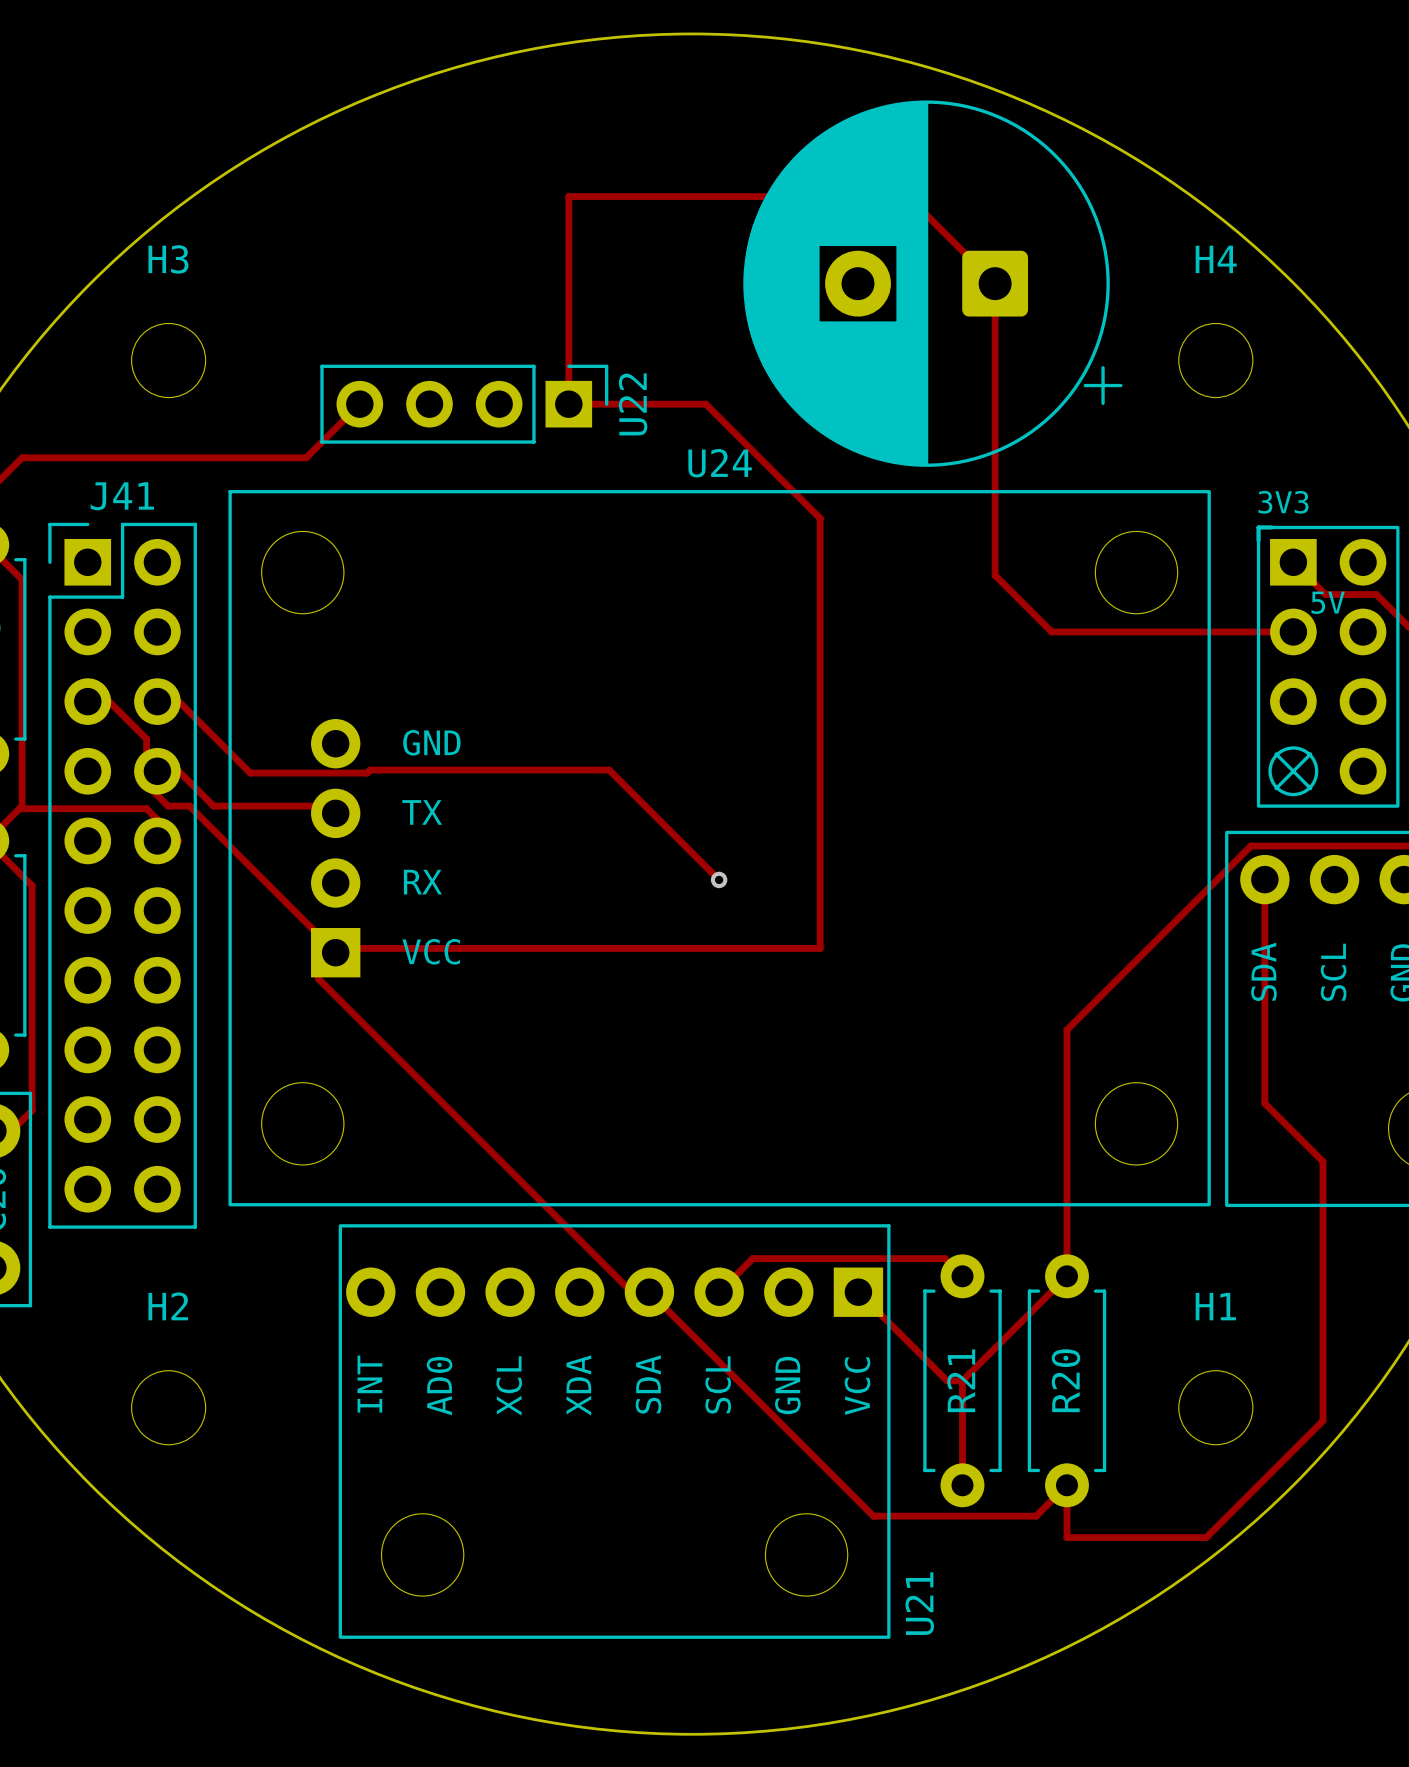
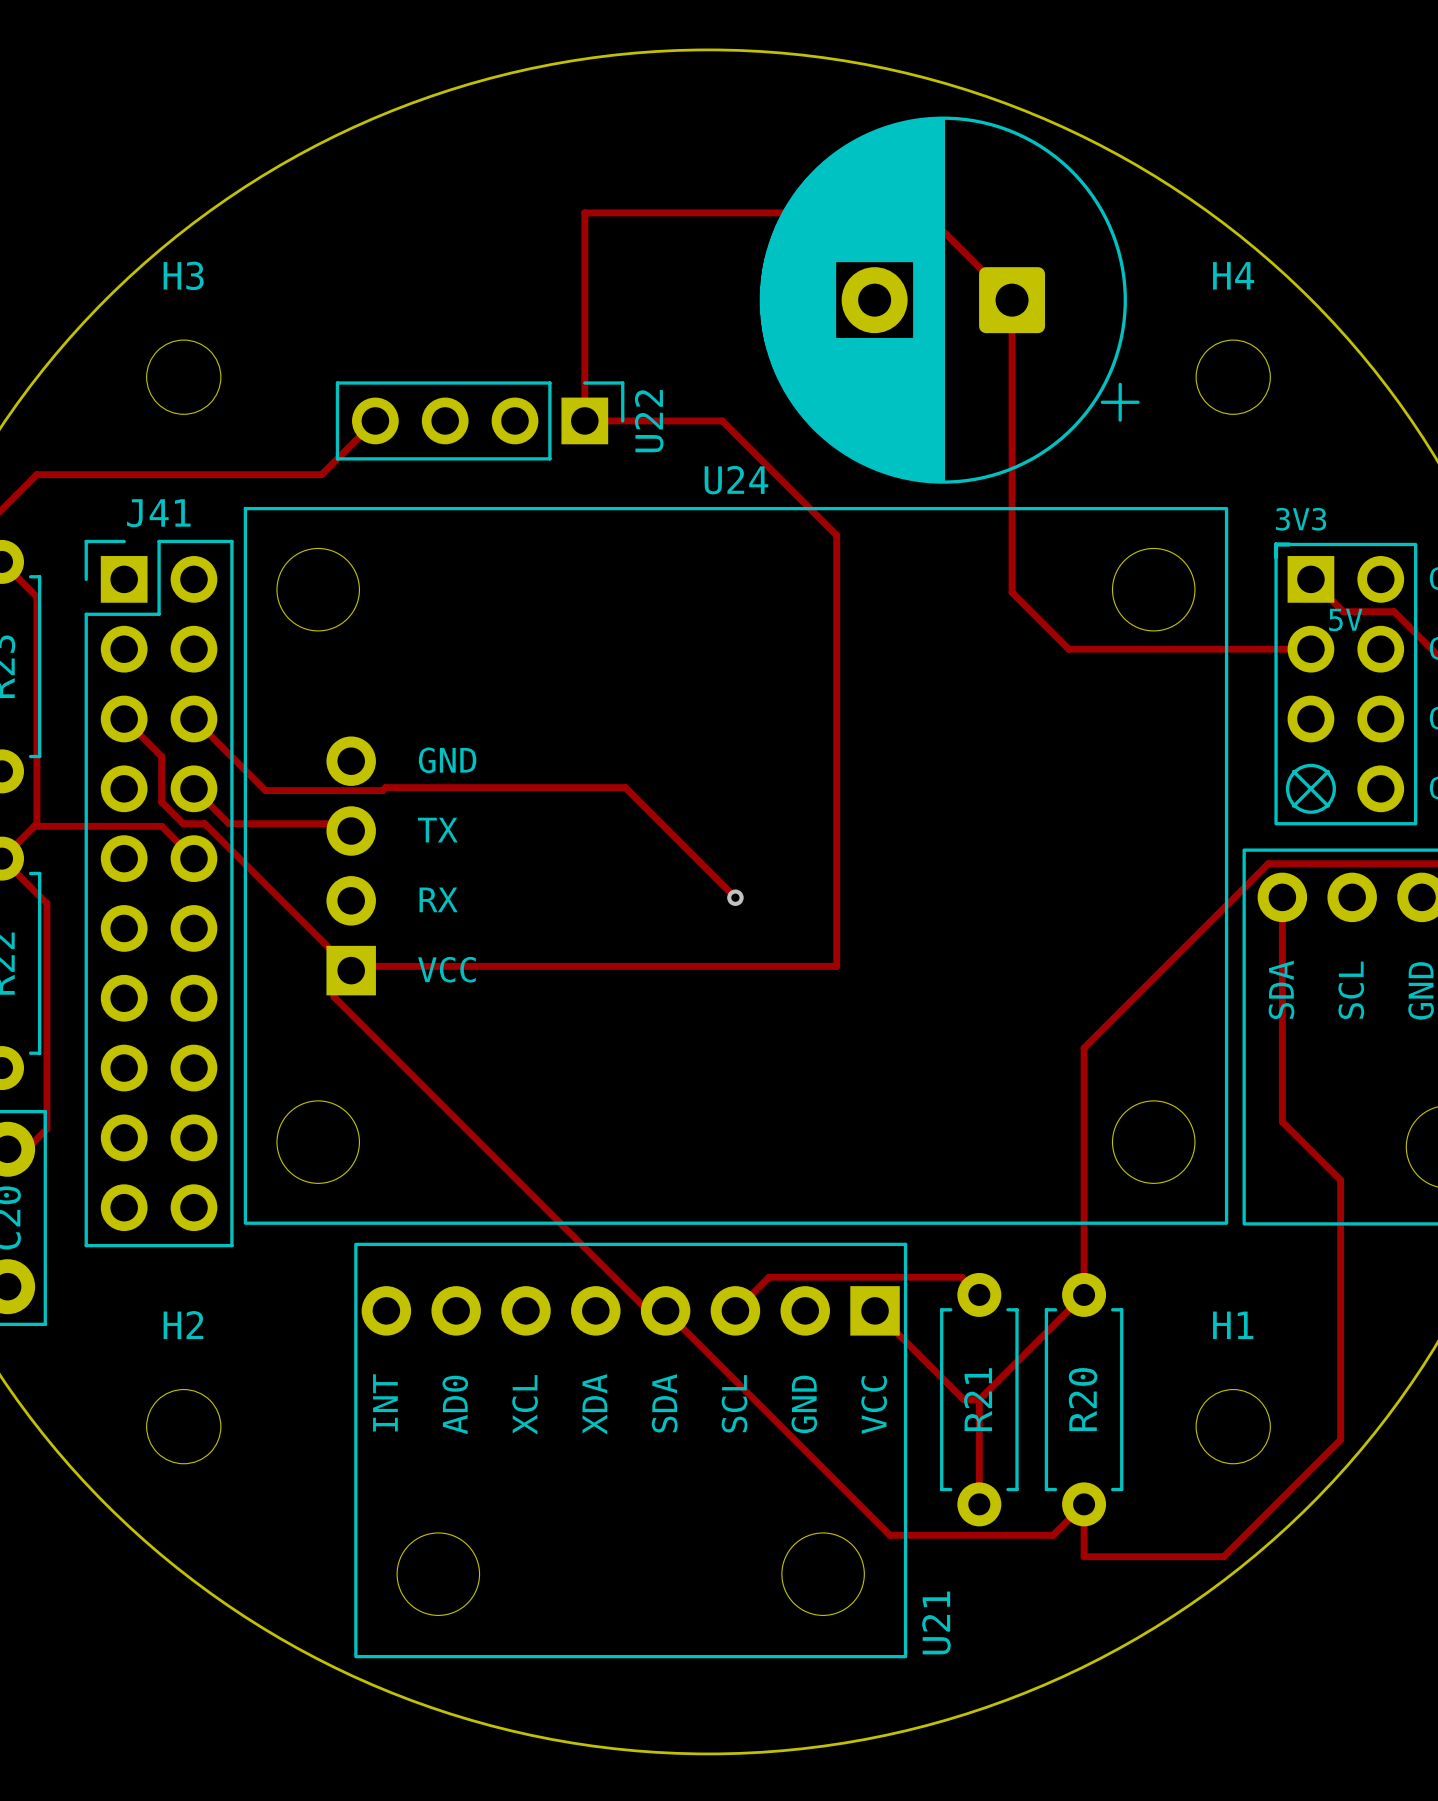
J41 position: (122, 875) -> (159, 893)

